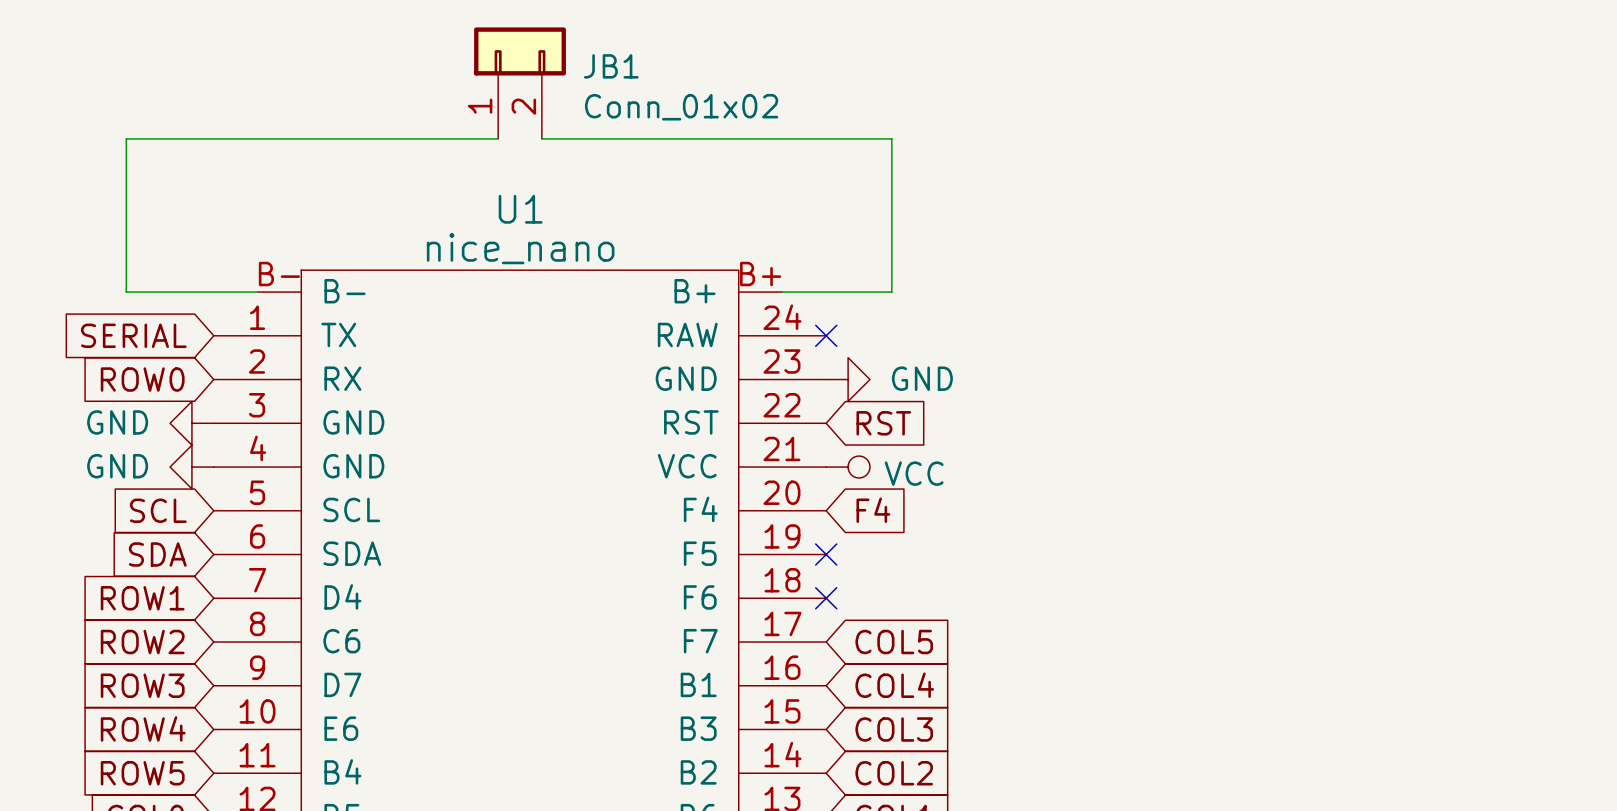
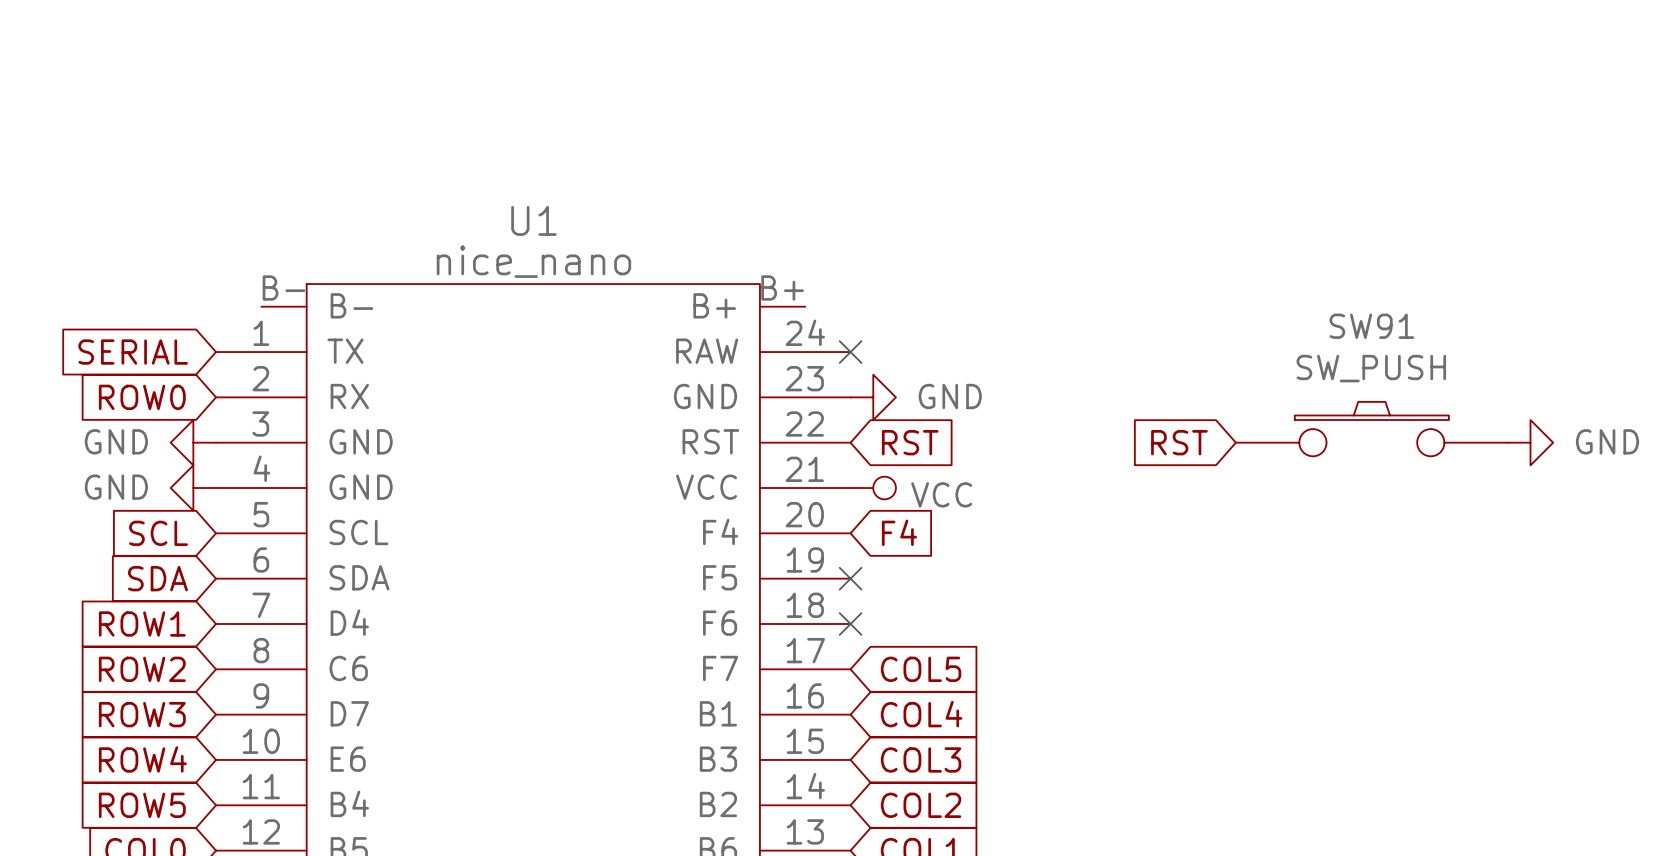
JB1: Conn_01x02 (520, 83) -> none
wire: (498, 138) (126, 138) (126, 292) (257, 292) -> none
wire: (541, 138) (891, 138) (891, 292) (782, 292) -> none
SW91: none -> SW_PUSH (1371, 429)
global label: none -> RST (1179, 442)
power symbol: none -> GND (1530, 442)

